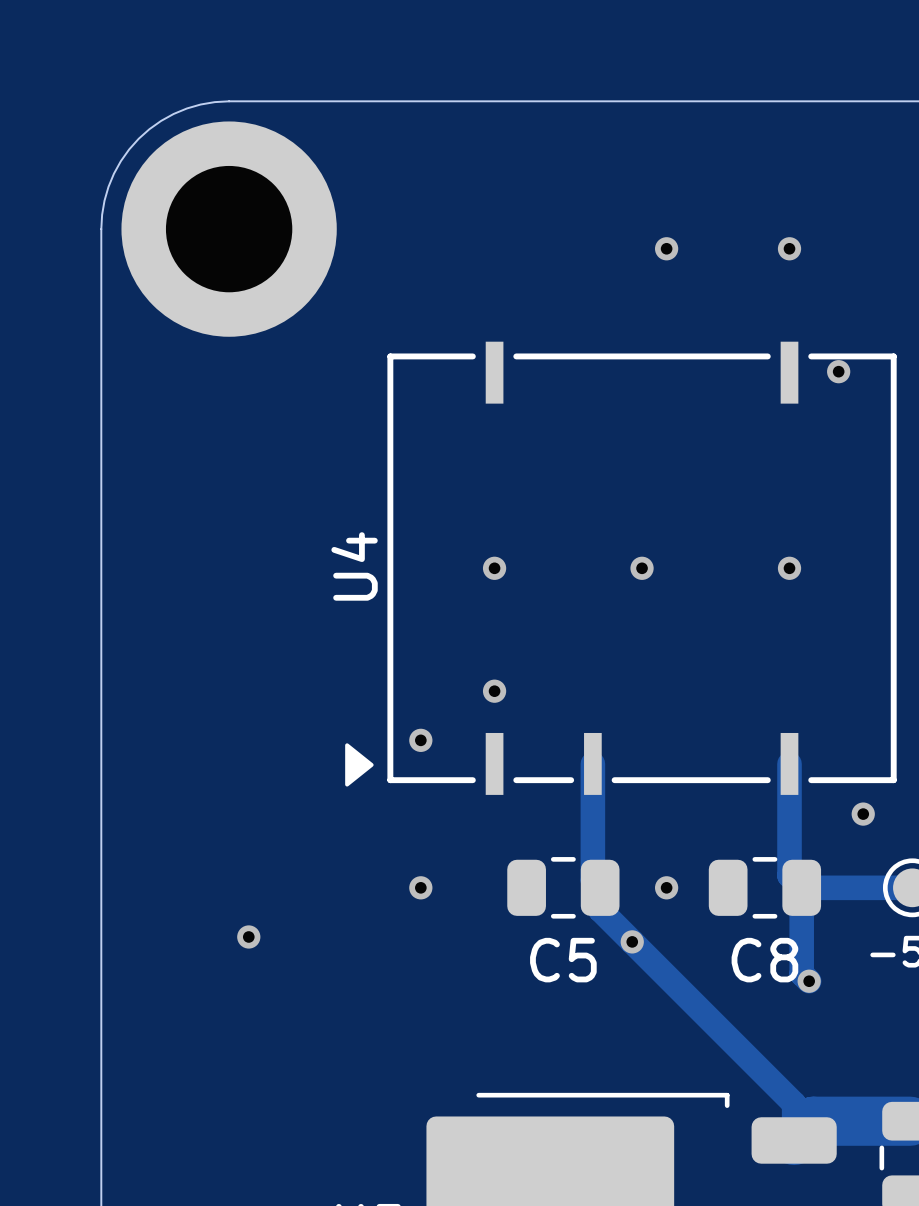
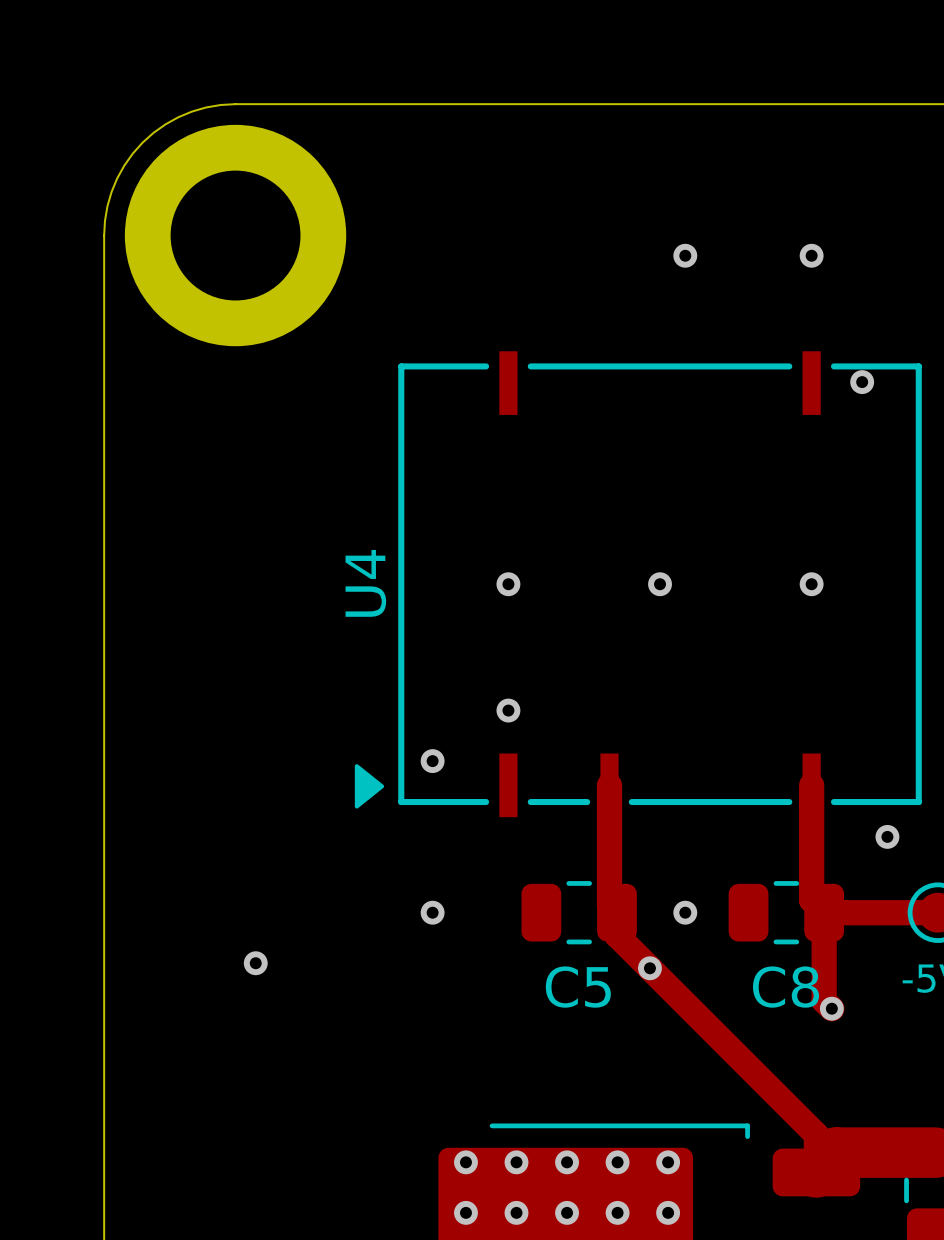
via: none -> (465, 1162)
via: none -> (516, 1162)
via: none -> (567, 1162)
via: none -> (617, 1162)
via: none -> (668, 1162)
via: none -> (465, 1212)
via: none -> (516, 1212)
via: none -> (567, 1212)
via: none -> (617, 1212)
via: none -> (668, 1212)

